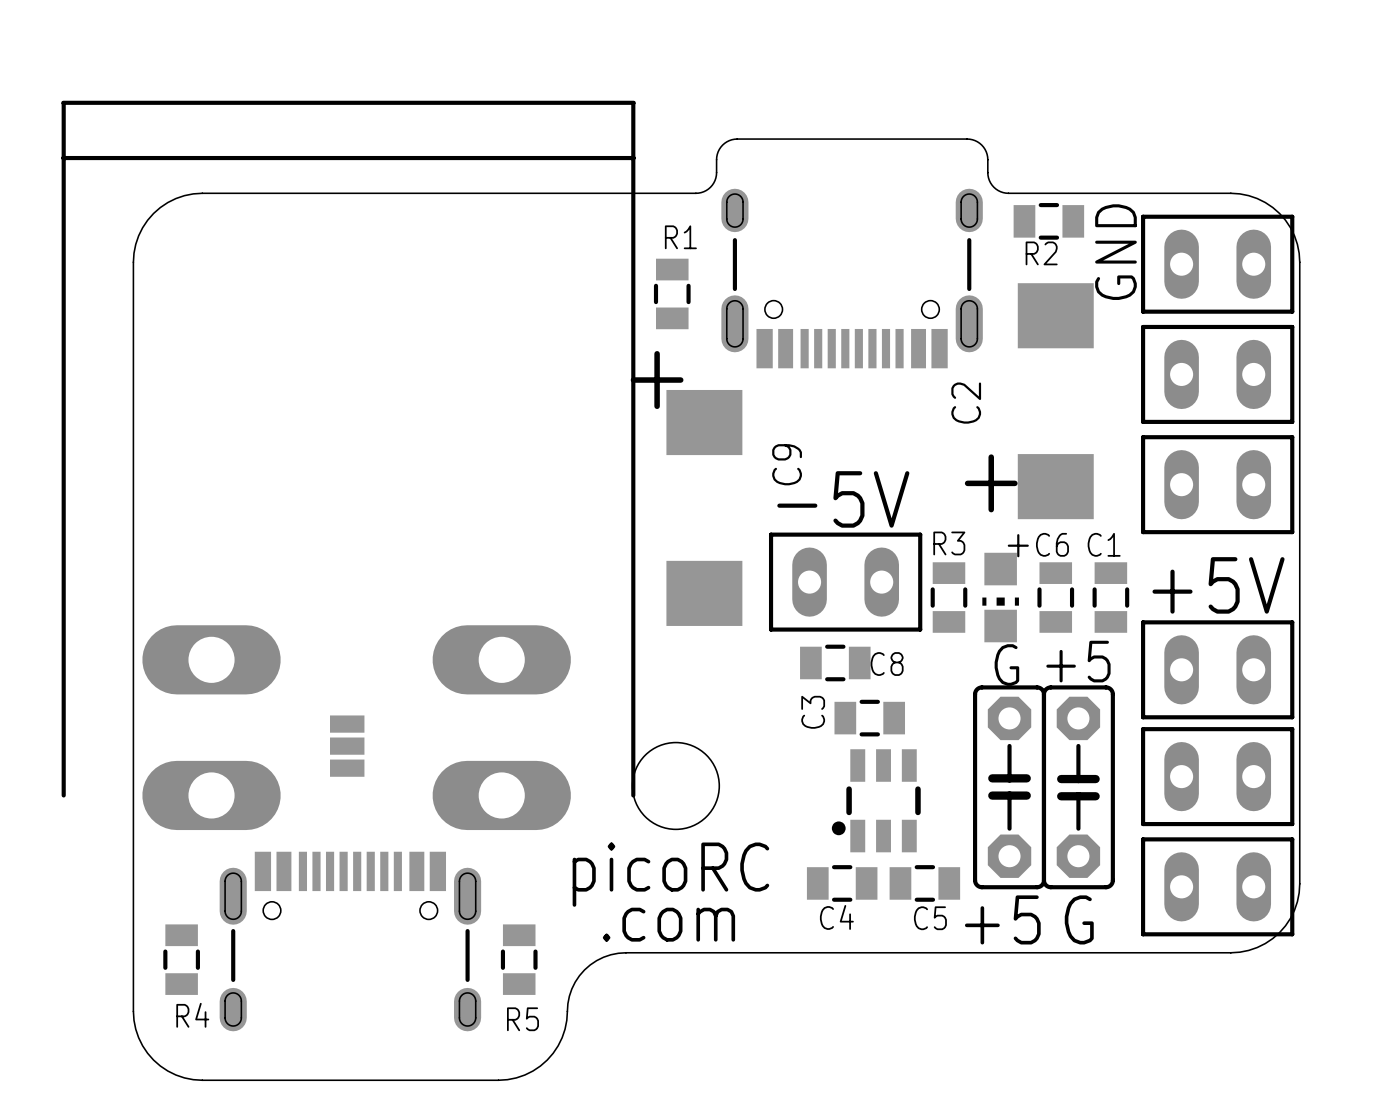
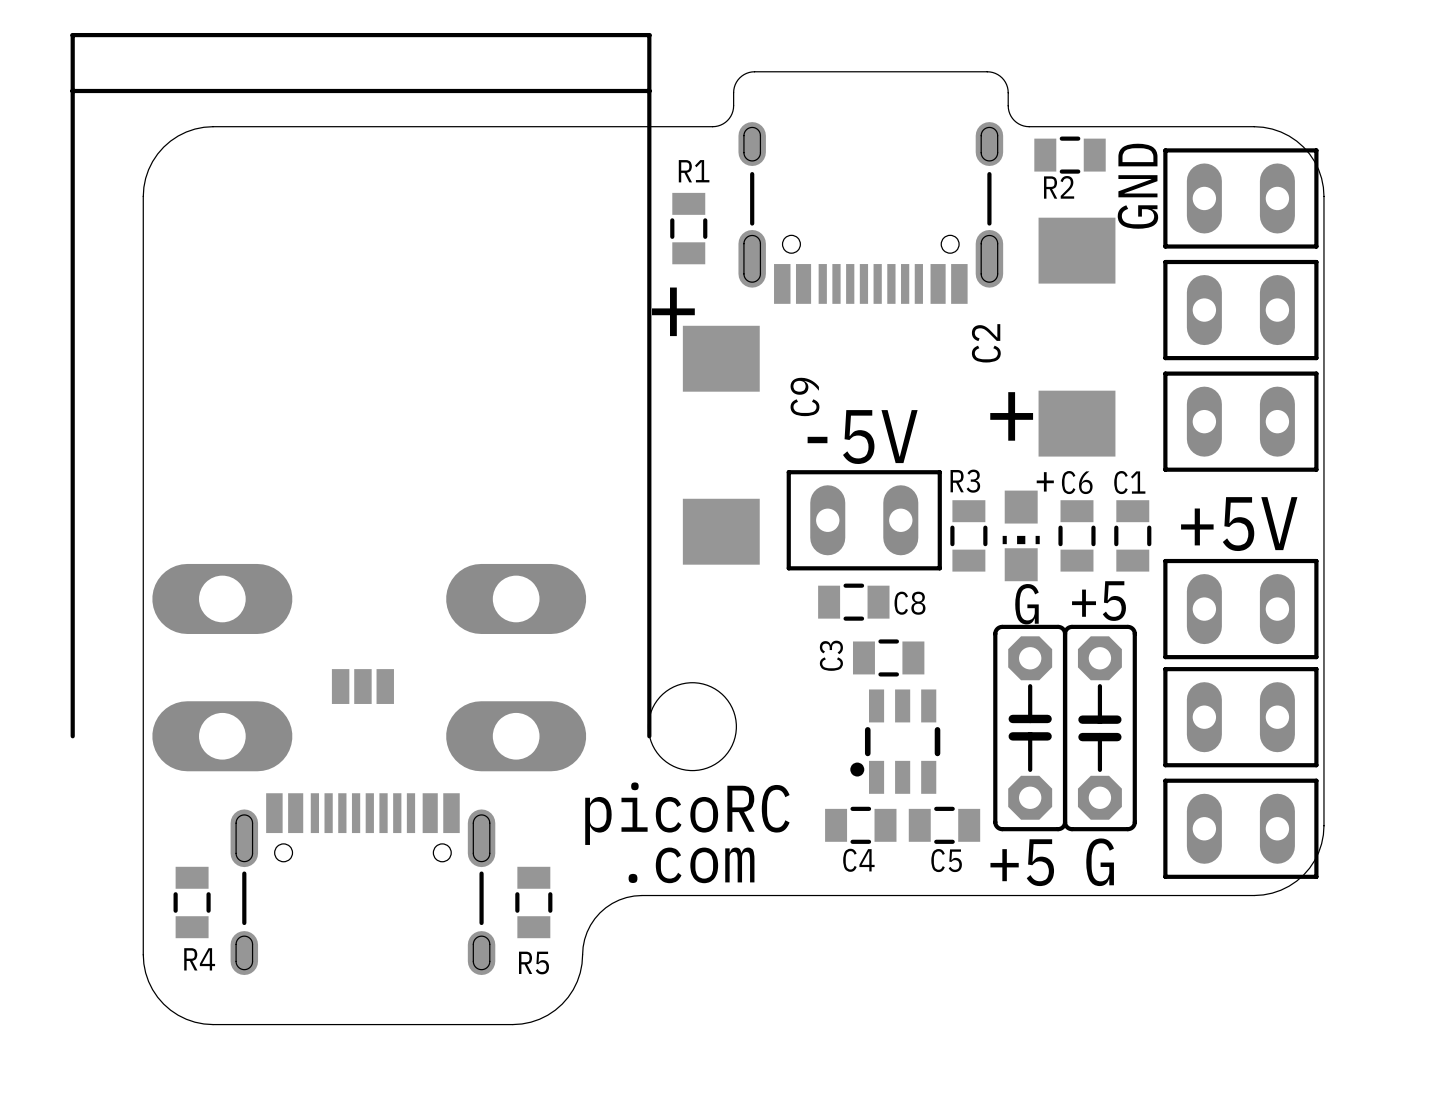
part rotation: 0° (347, 746) -> 90° clockwise (362, 686)

